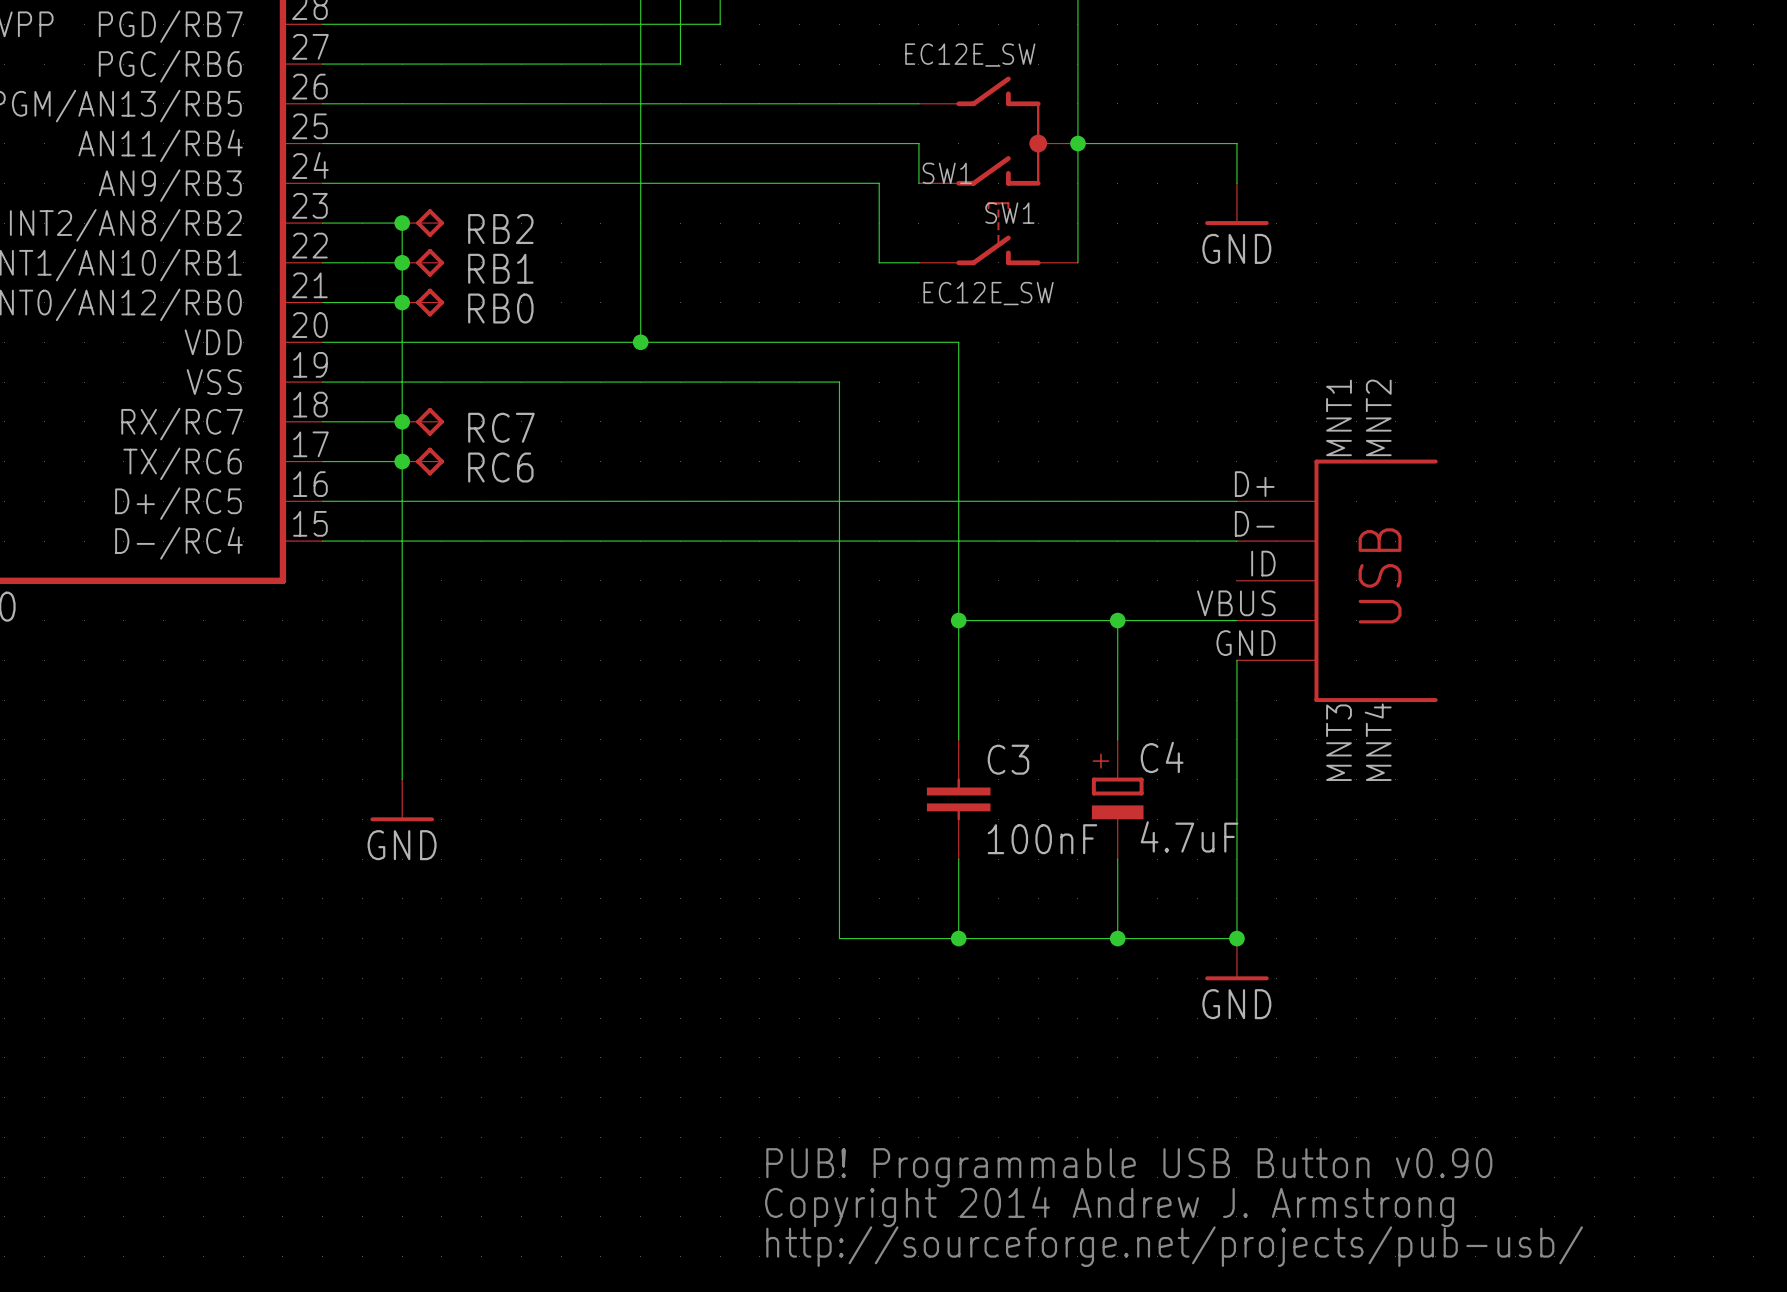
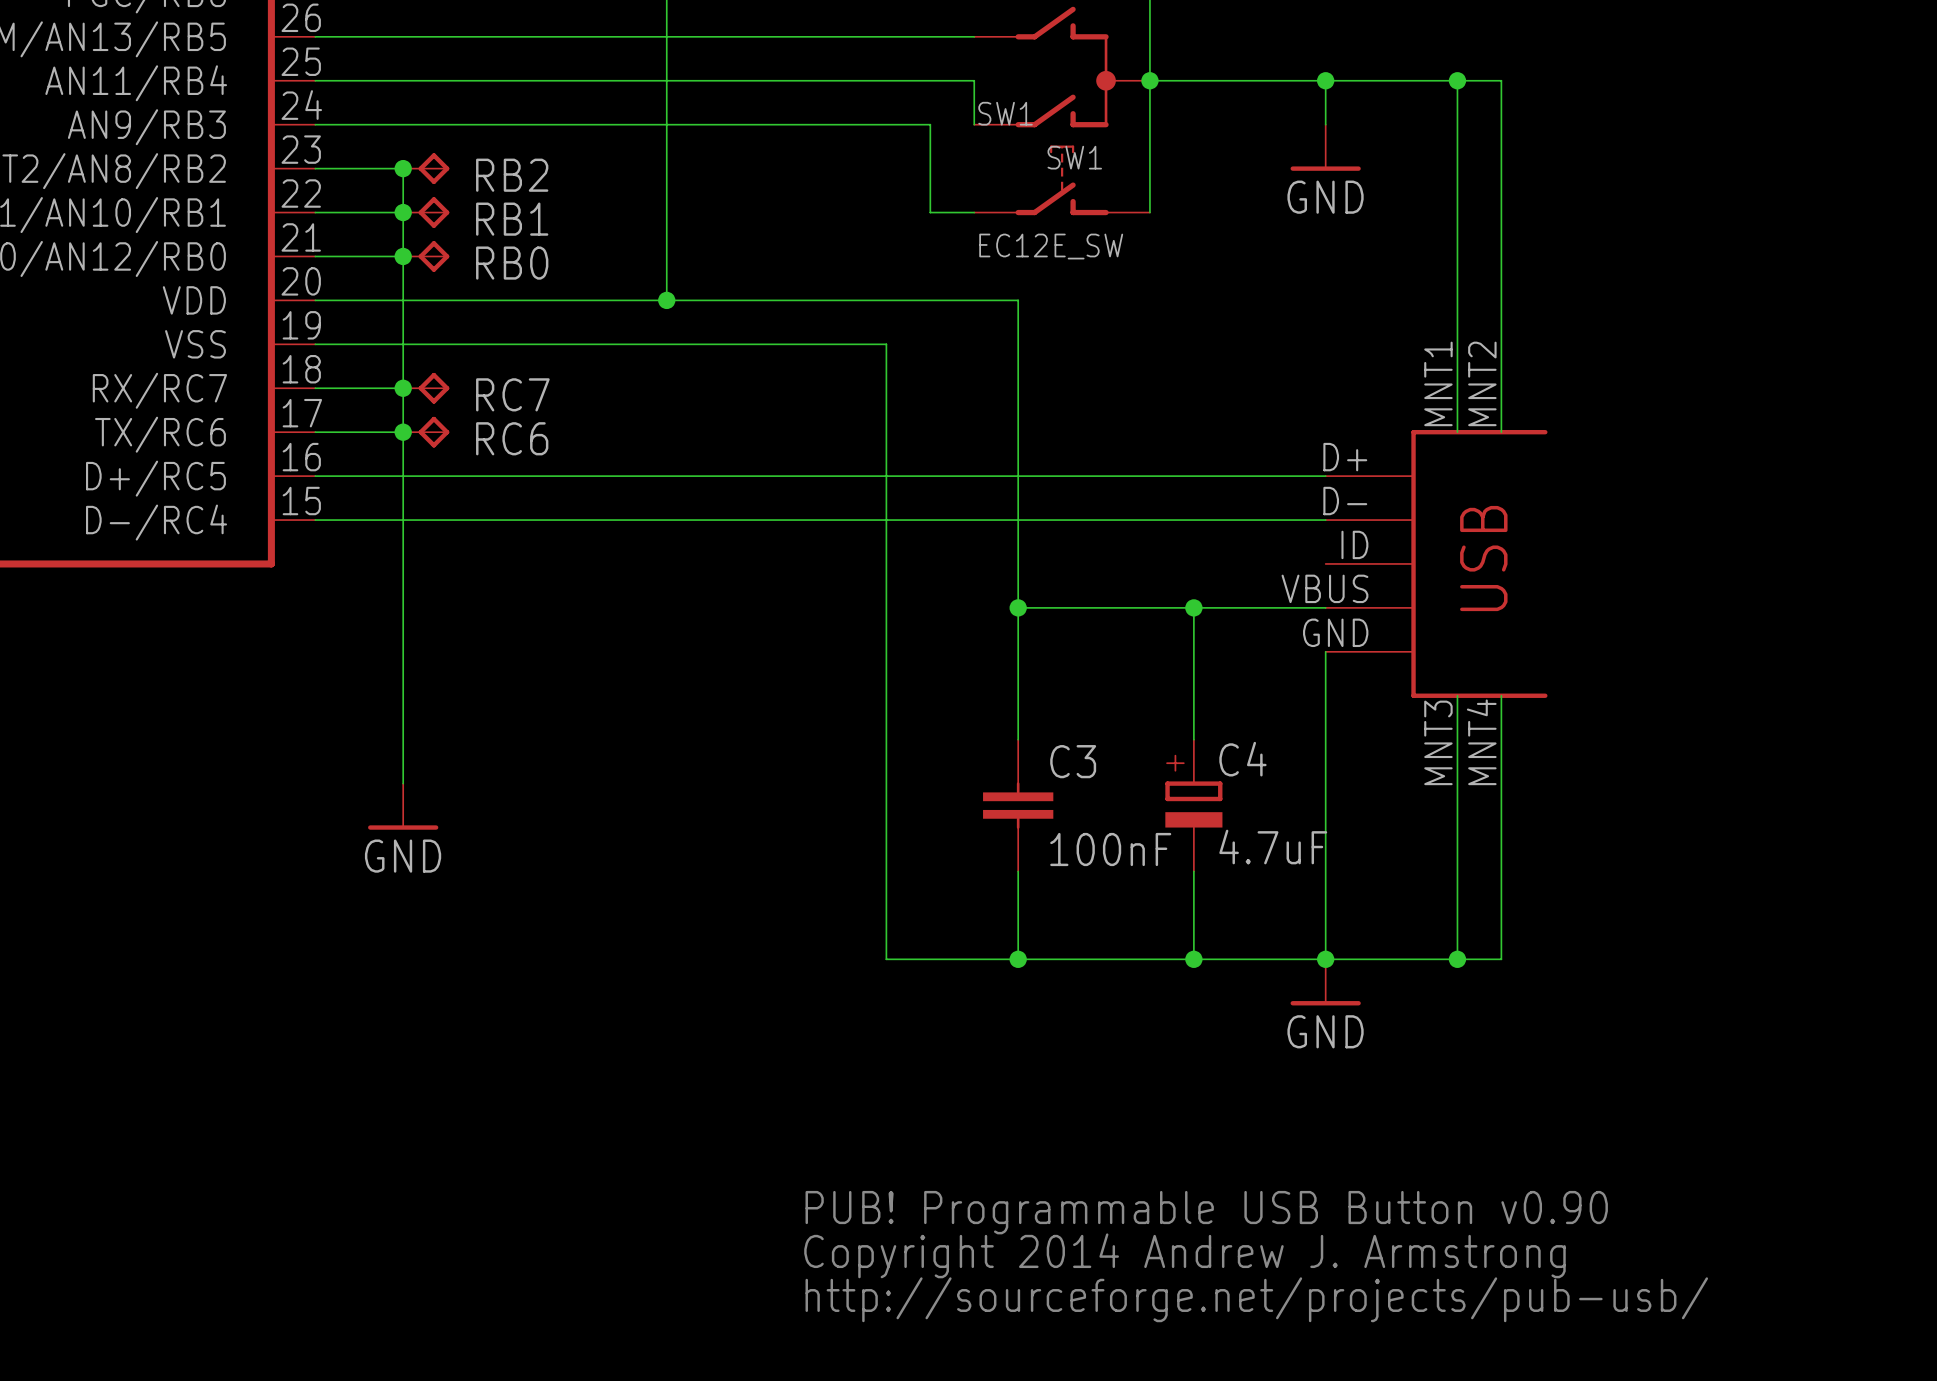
wire: none -> (1325, 80) (1501, 80) (1501, 432)
junction: none -> (1325, 80)
wire: none -> (1457, 80) (1457, 432)
junction: none -> (1457, 80)
wire: none -> (1457, 695) (1457, 959)
wire: none -> (1501, 695) (1501, 959) (1325, 959)
junction: none -> (1457, 959)

